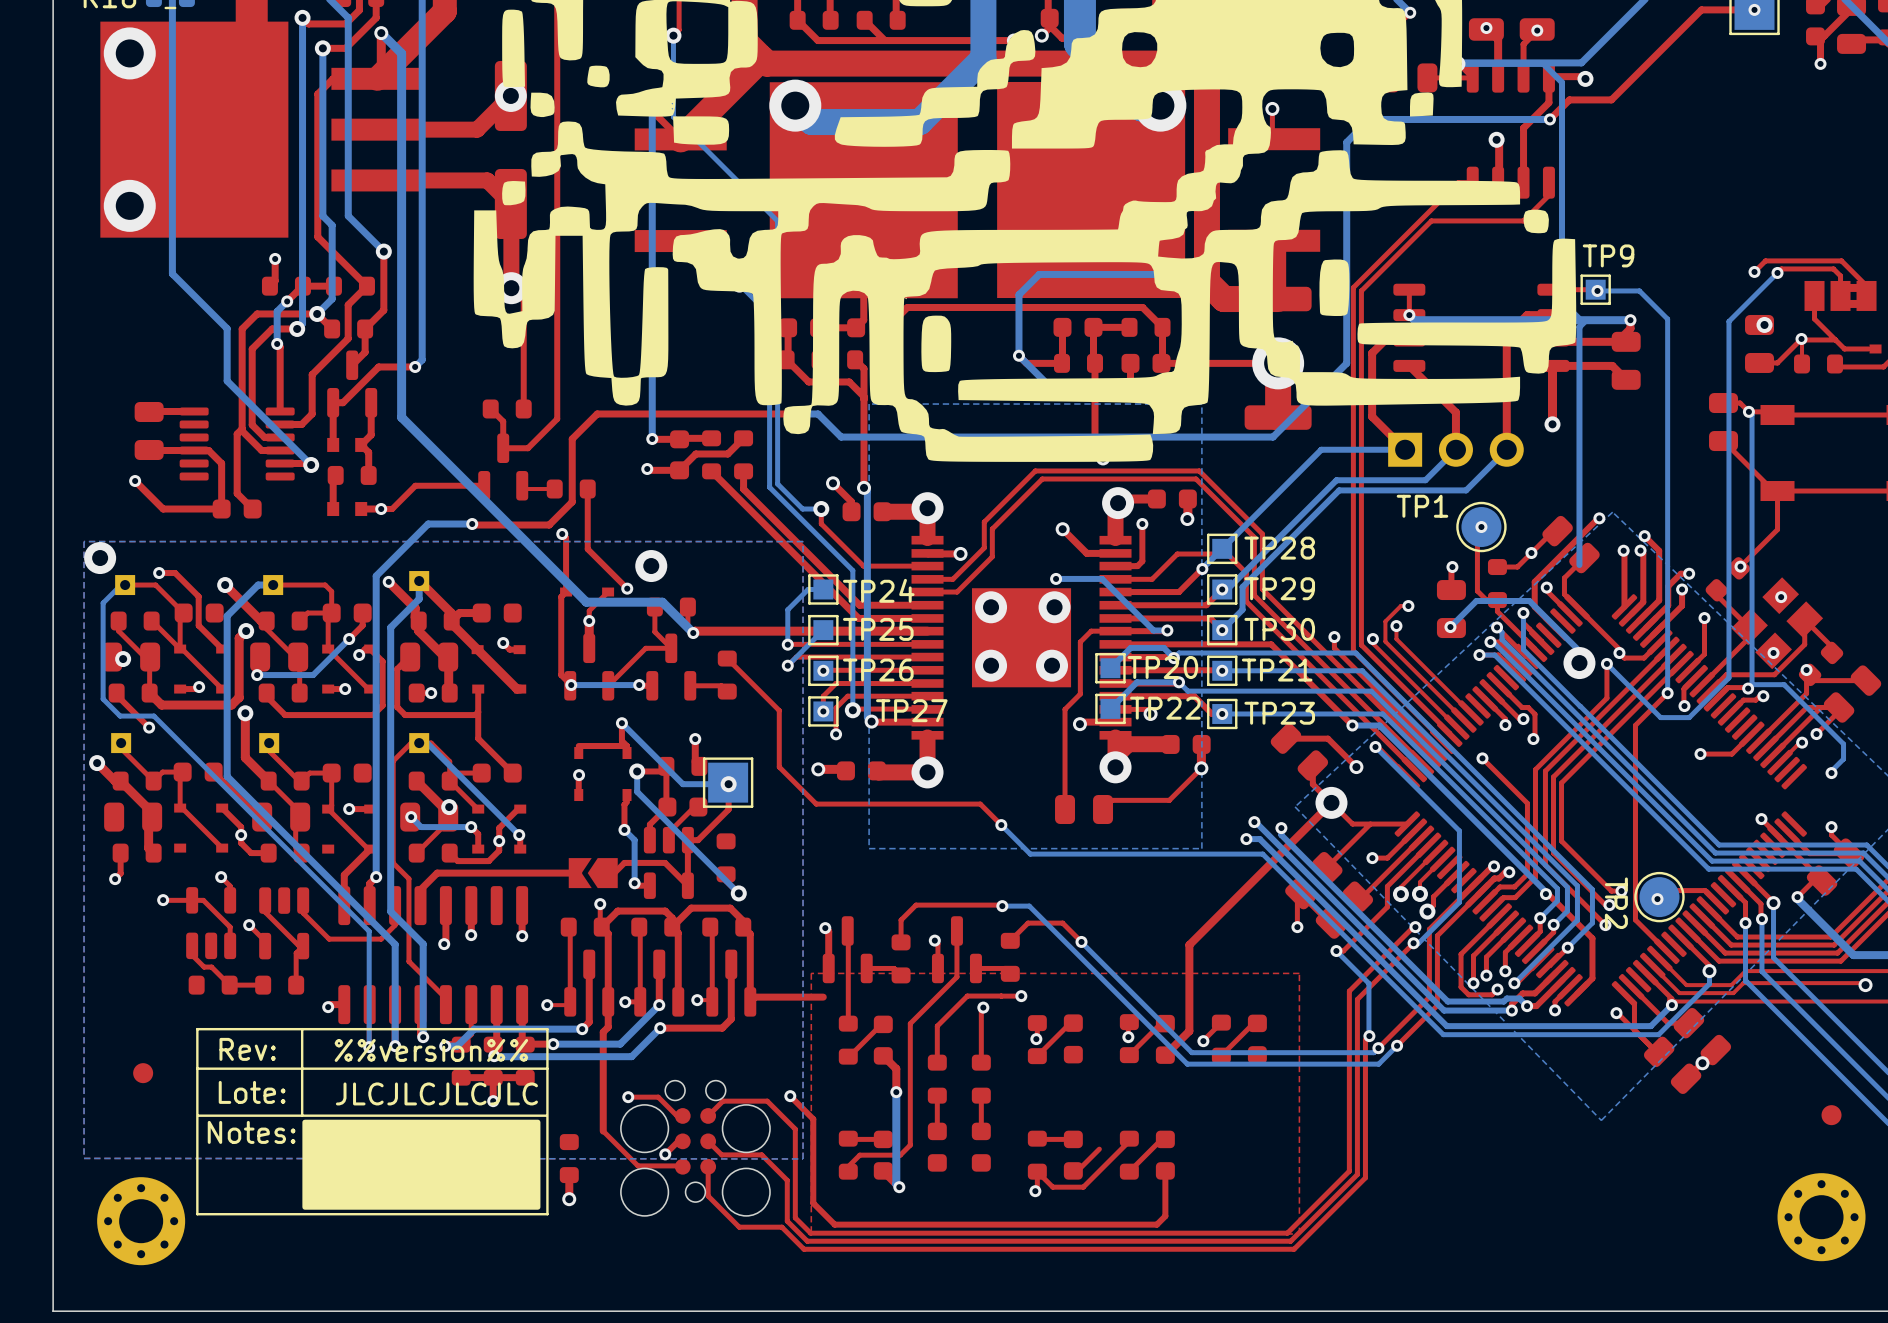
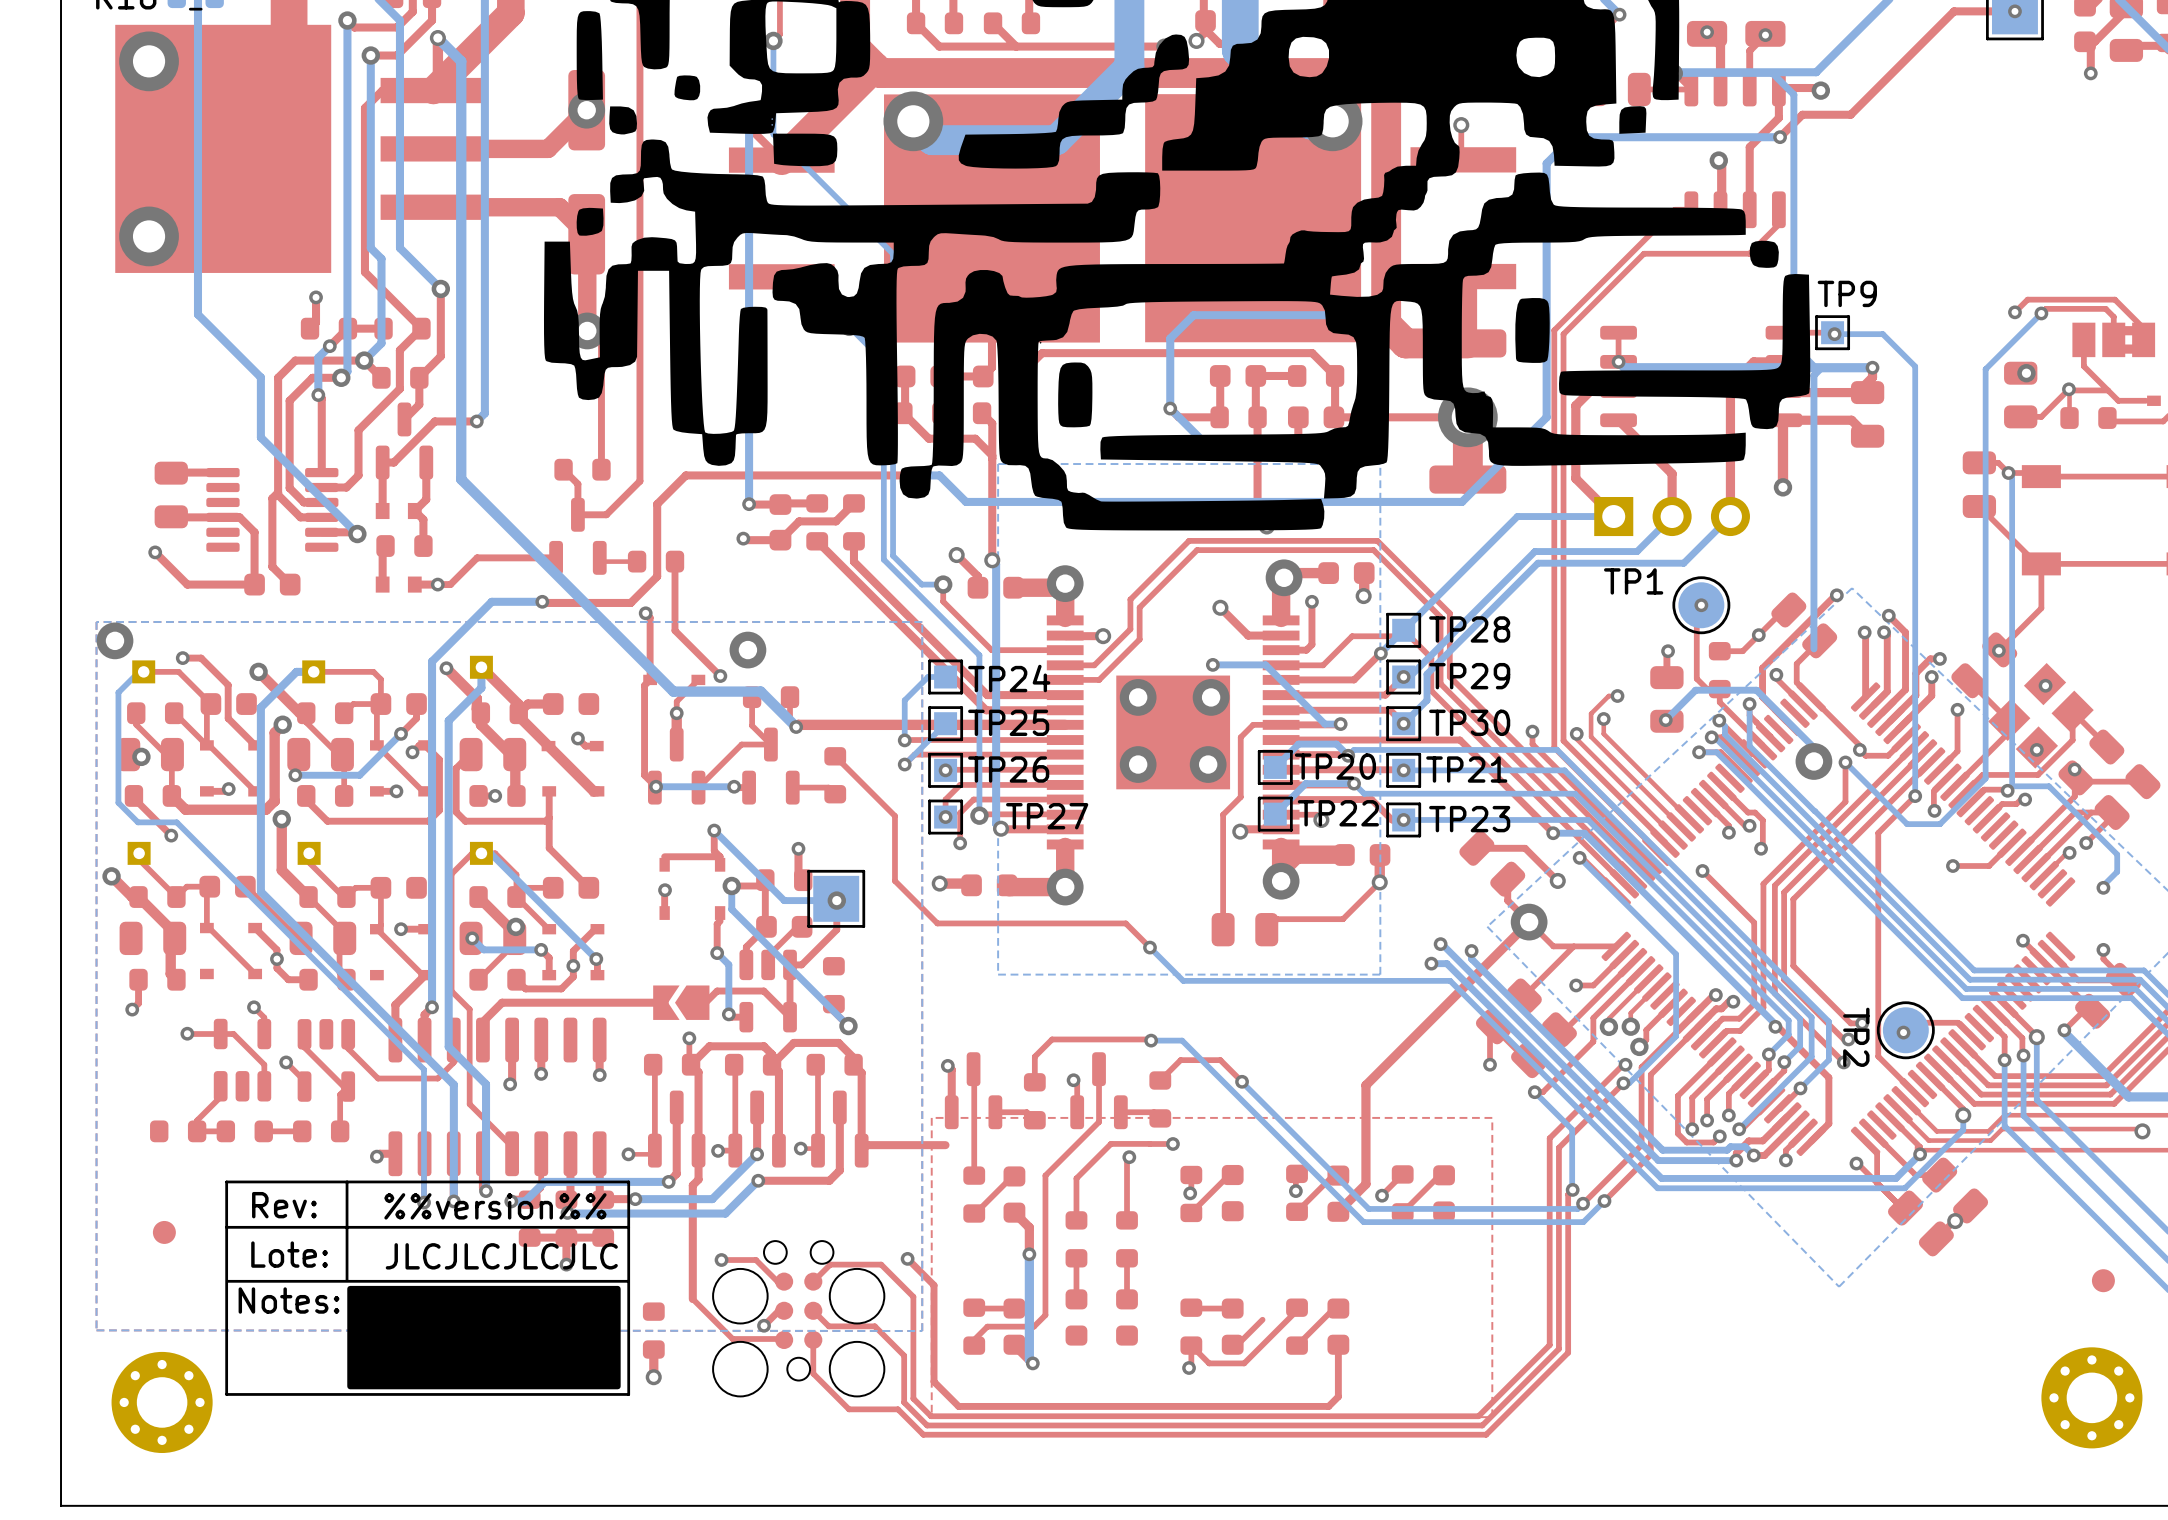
part footprint: [1705, 557, 1750, 602] -> [1951, 632, 2018, 699]
part footprint: [1798, 641, 1844, 687] -> [2058, 729, 2125, 796]
top track: (192, 955) (204, 967) (211, 967) (229, 985) (233, 985) -> (220, 1096) (197, 1120) (197, 1131) (230, 1131)
part: none -> (178, 1131)

